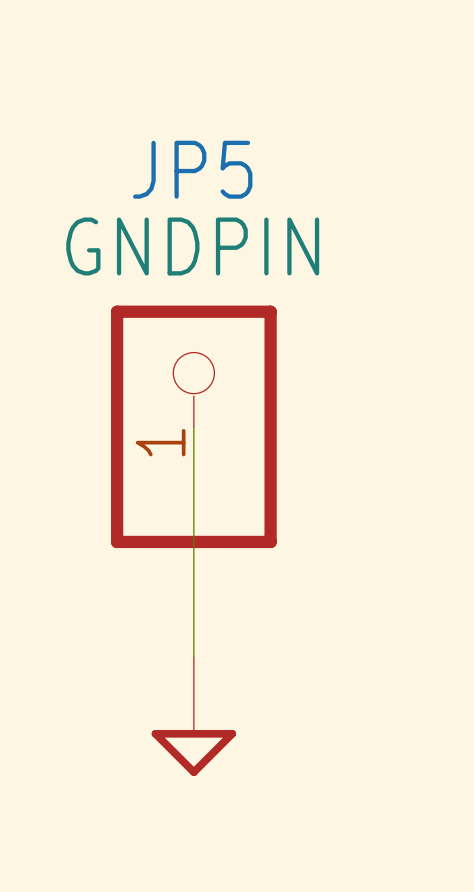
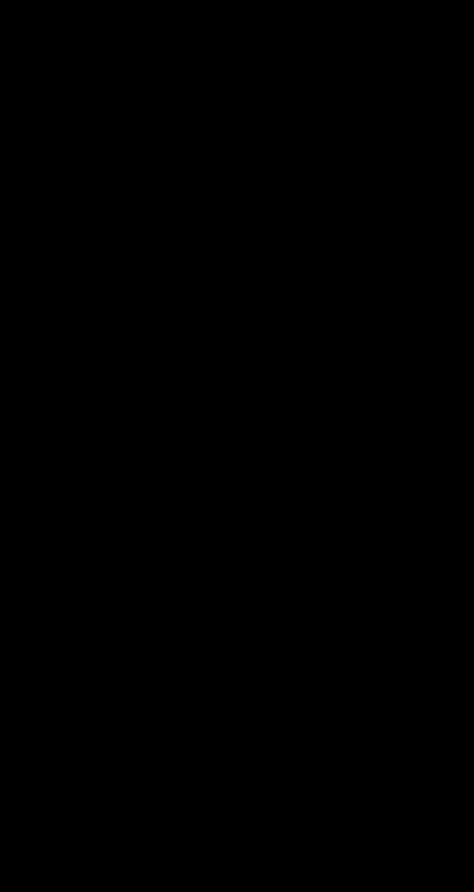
wire: (193, 426) (193, 657) -> none
JP5: GNDPIN (193, 426) -> none
power symbol: (193, 716) -> none

